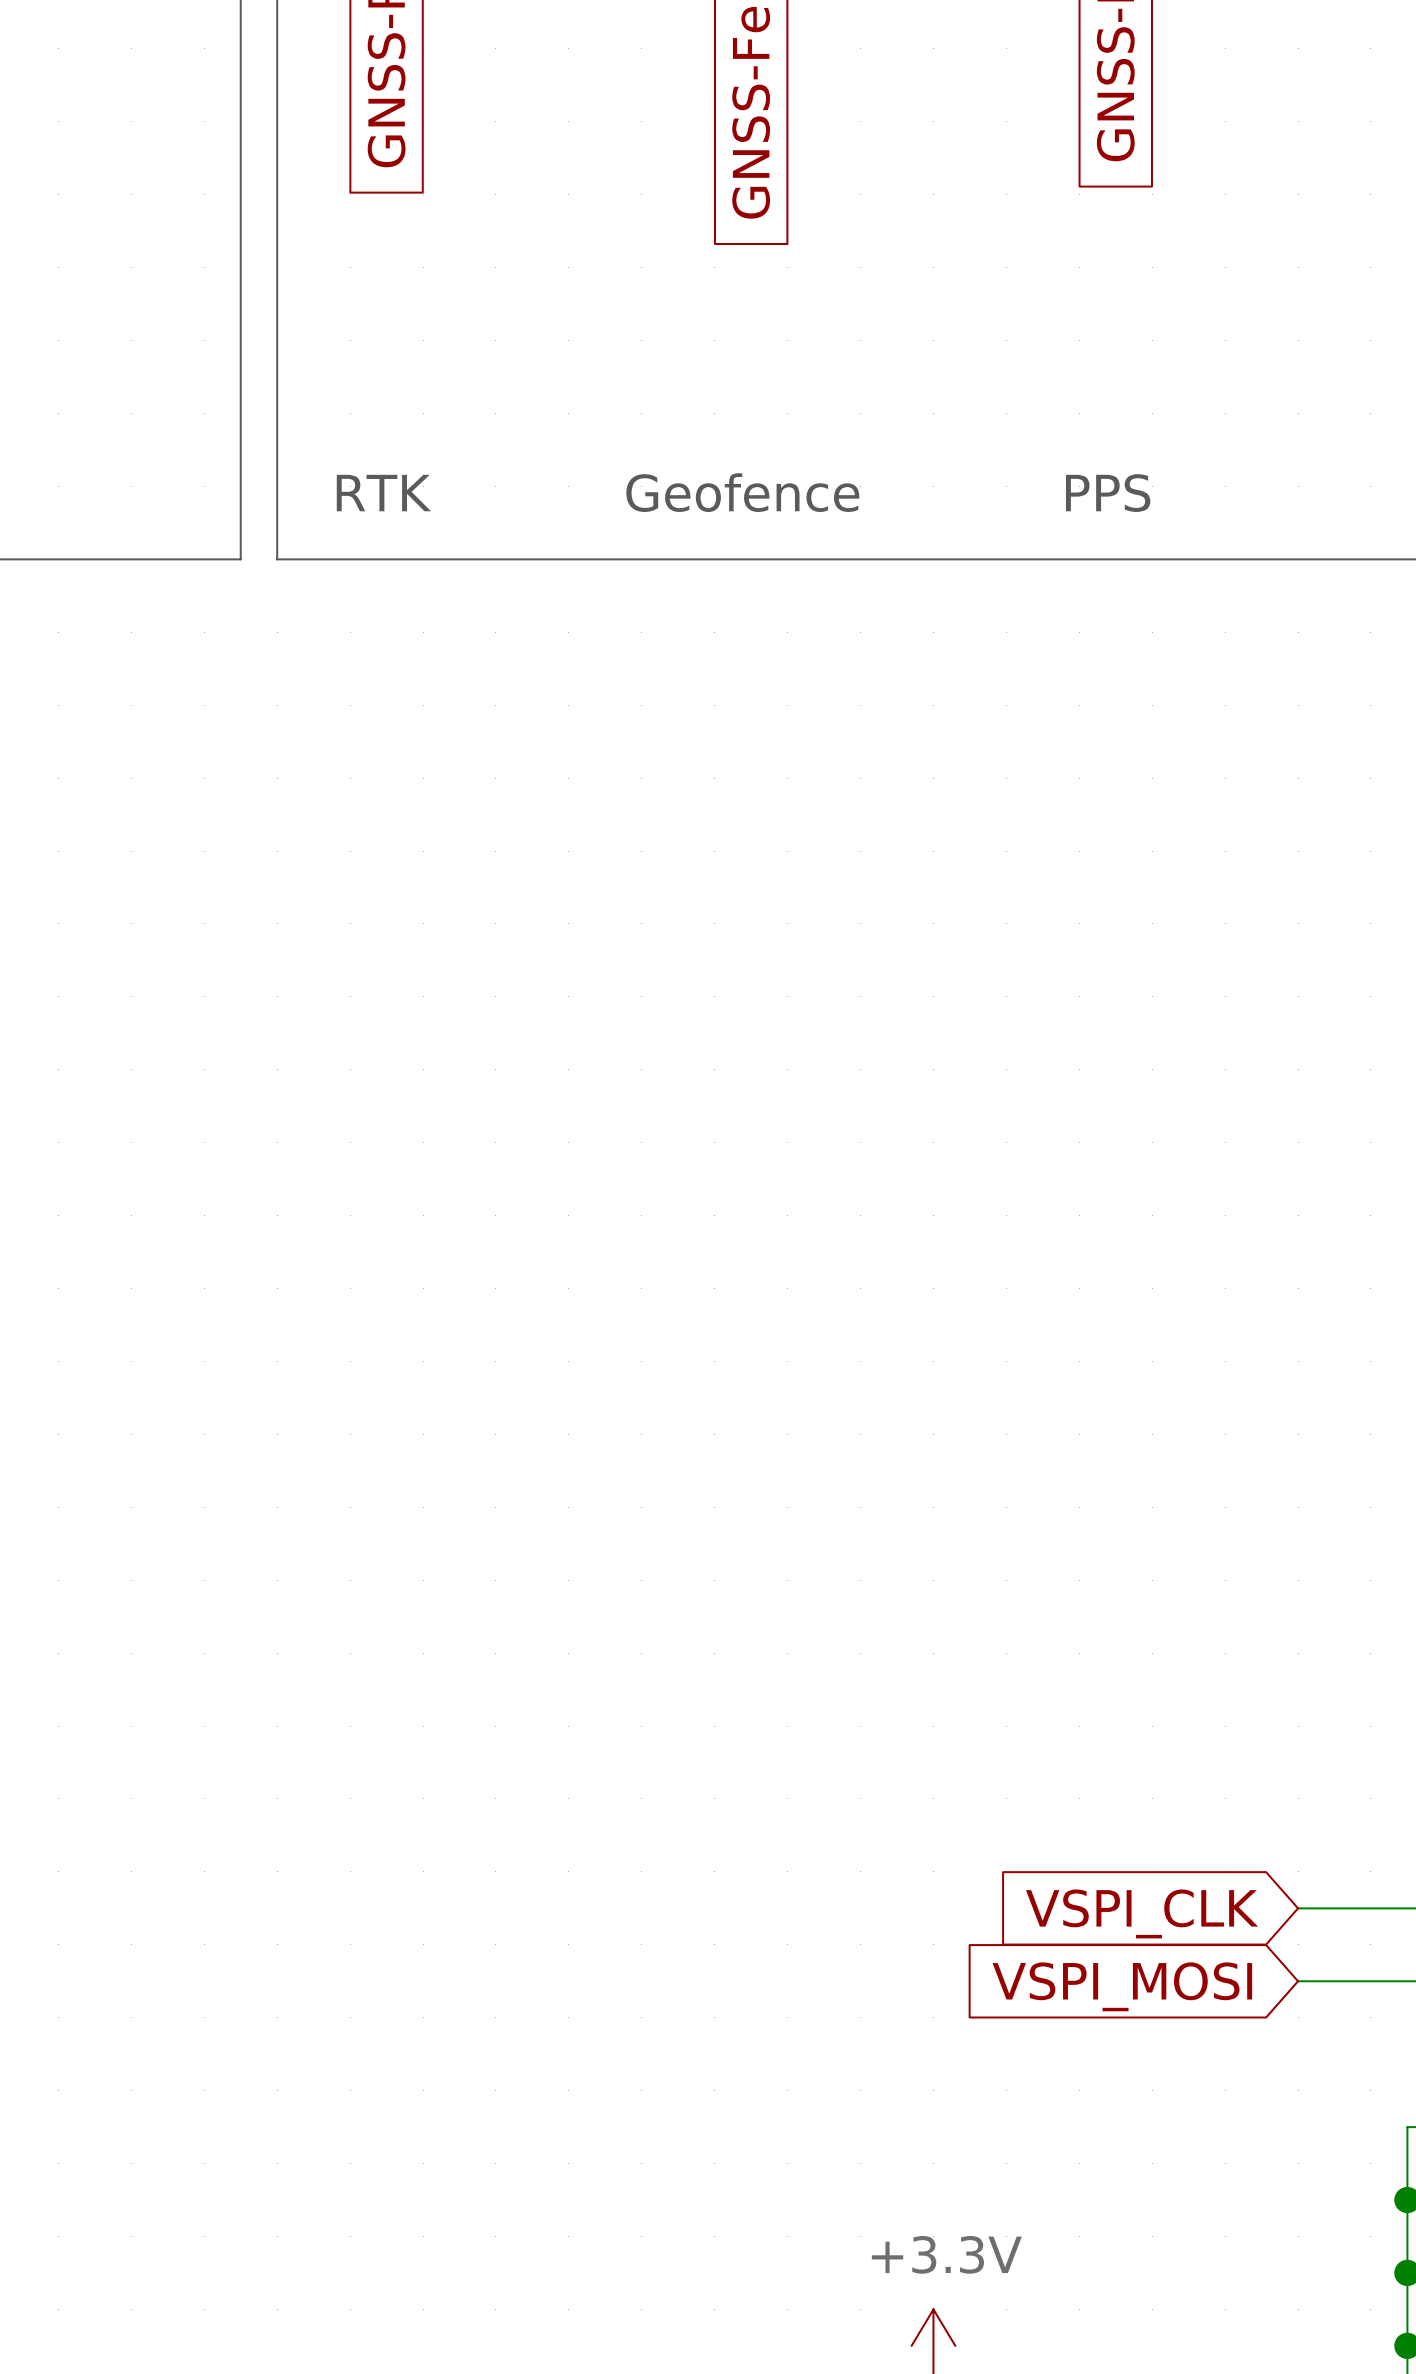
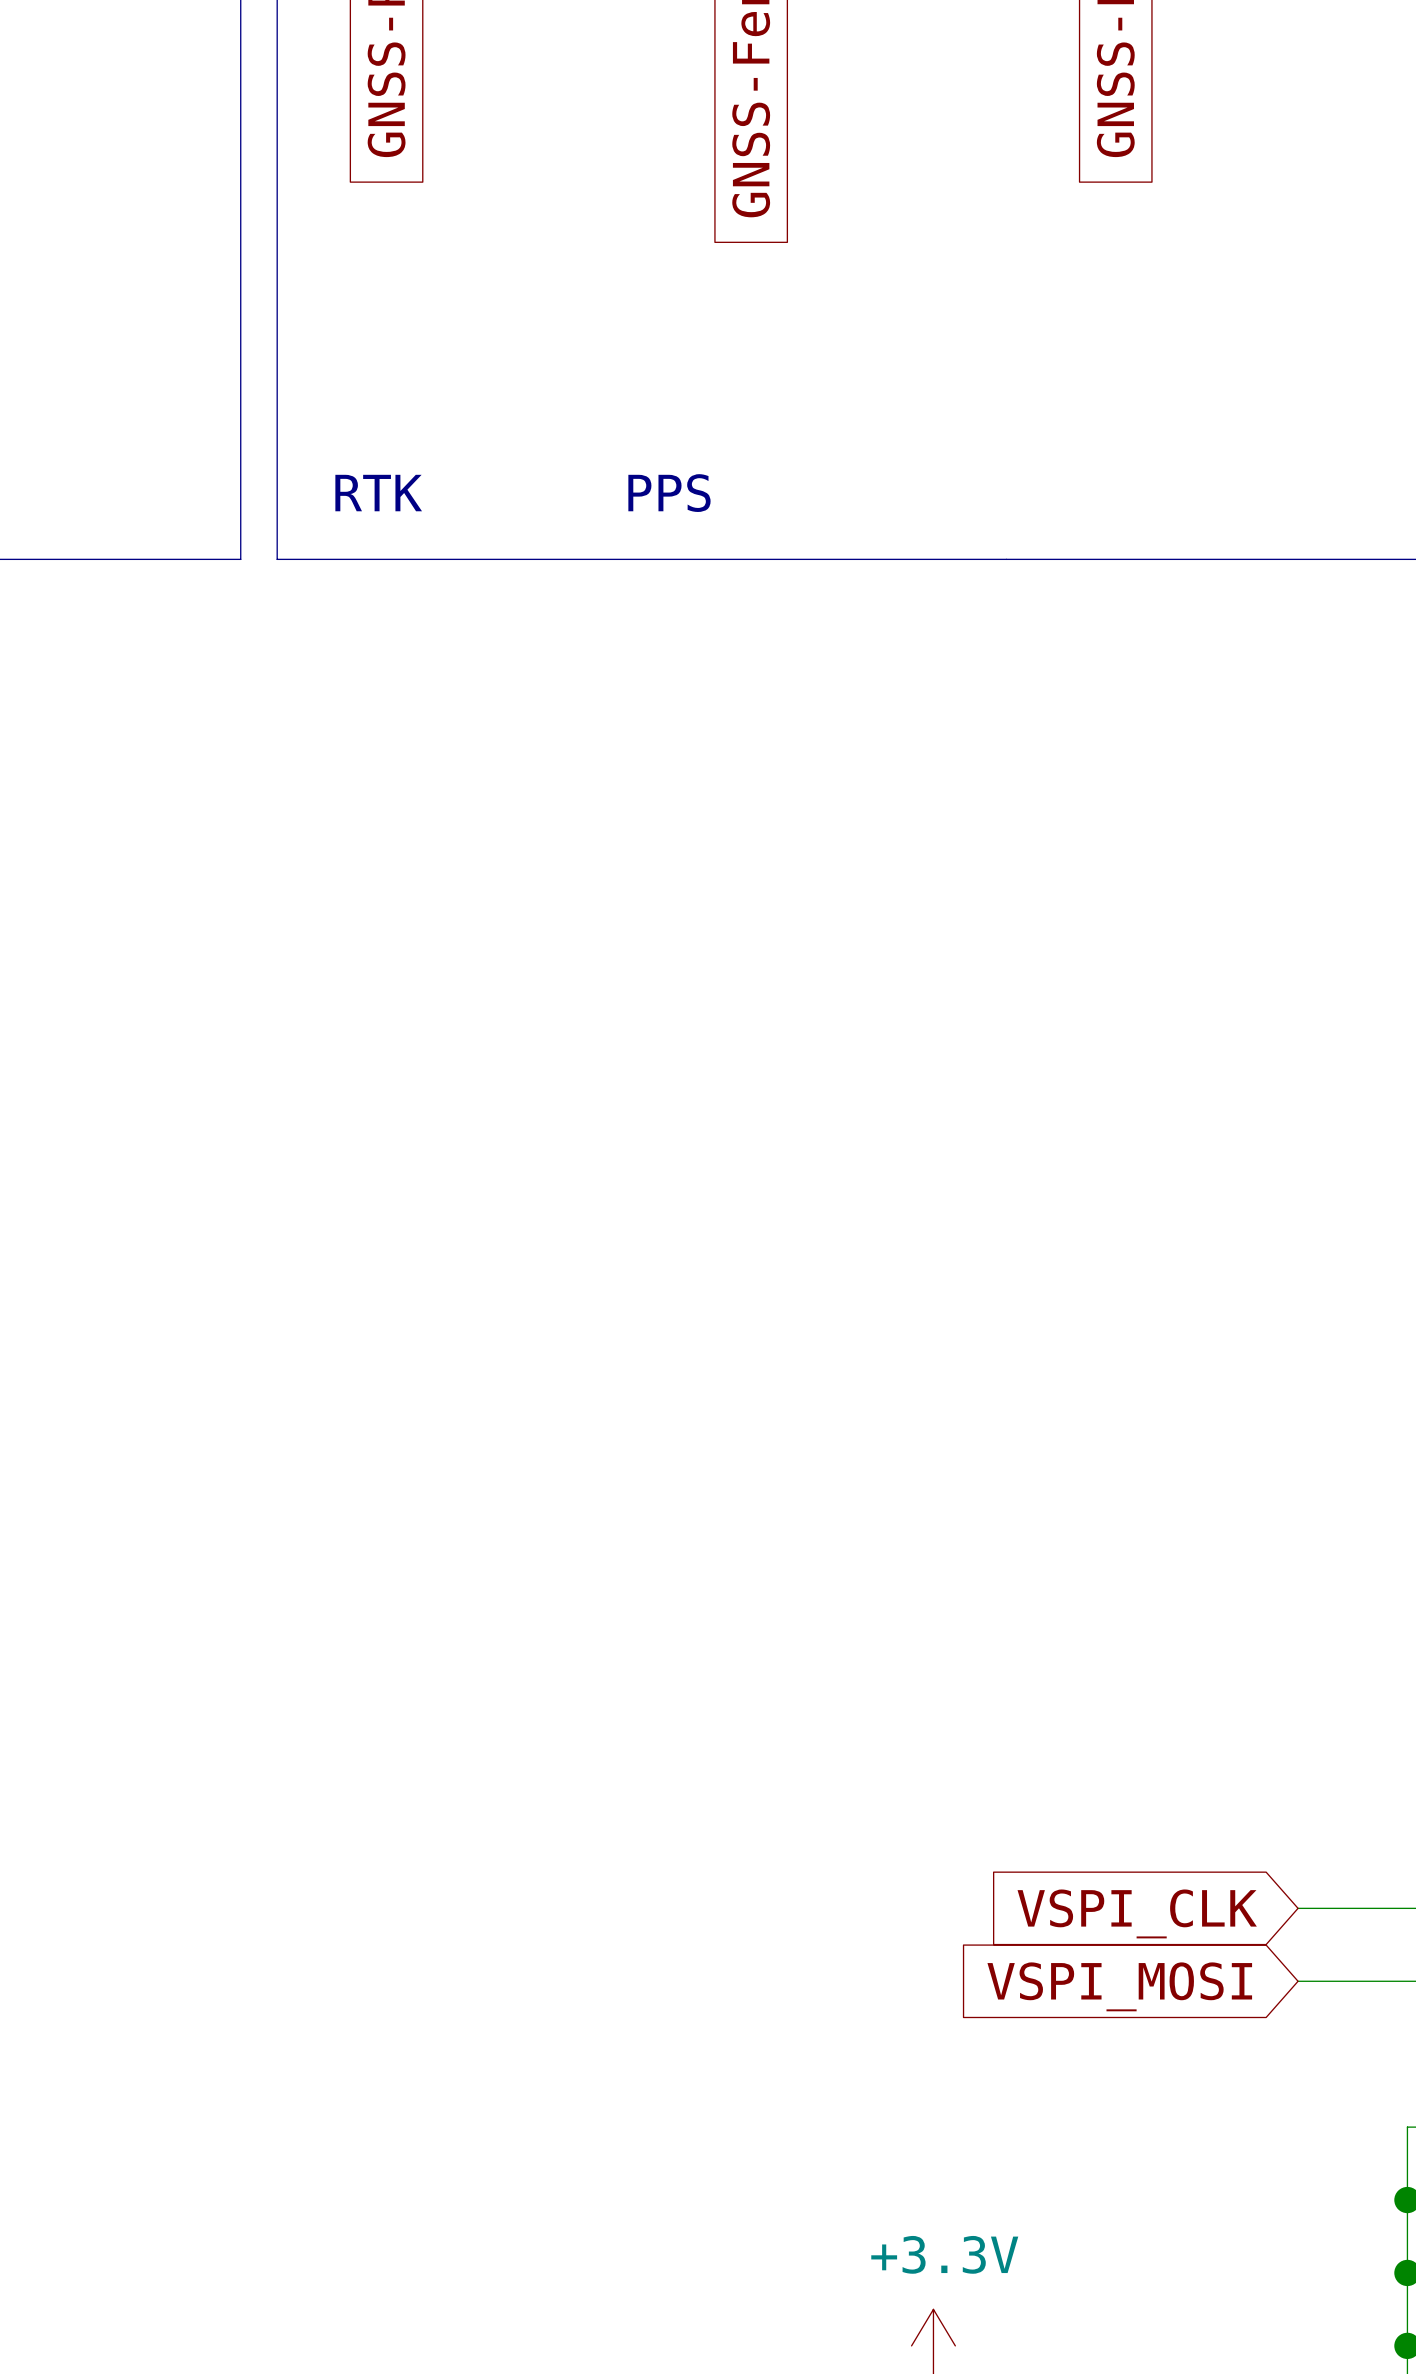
text: Geofence (742, 492) -> PPS (669, 493)
text: PPS (1108, 493) -> none

